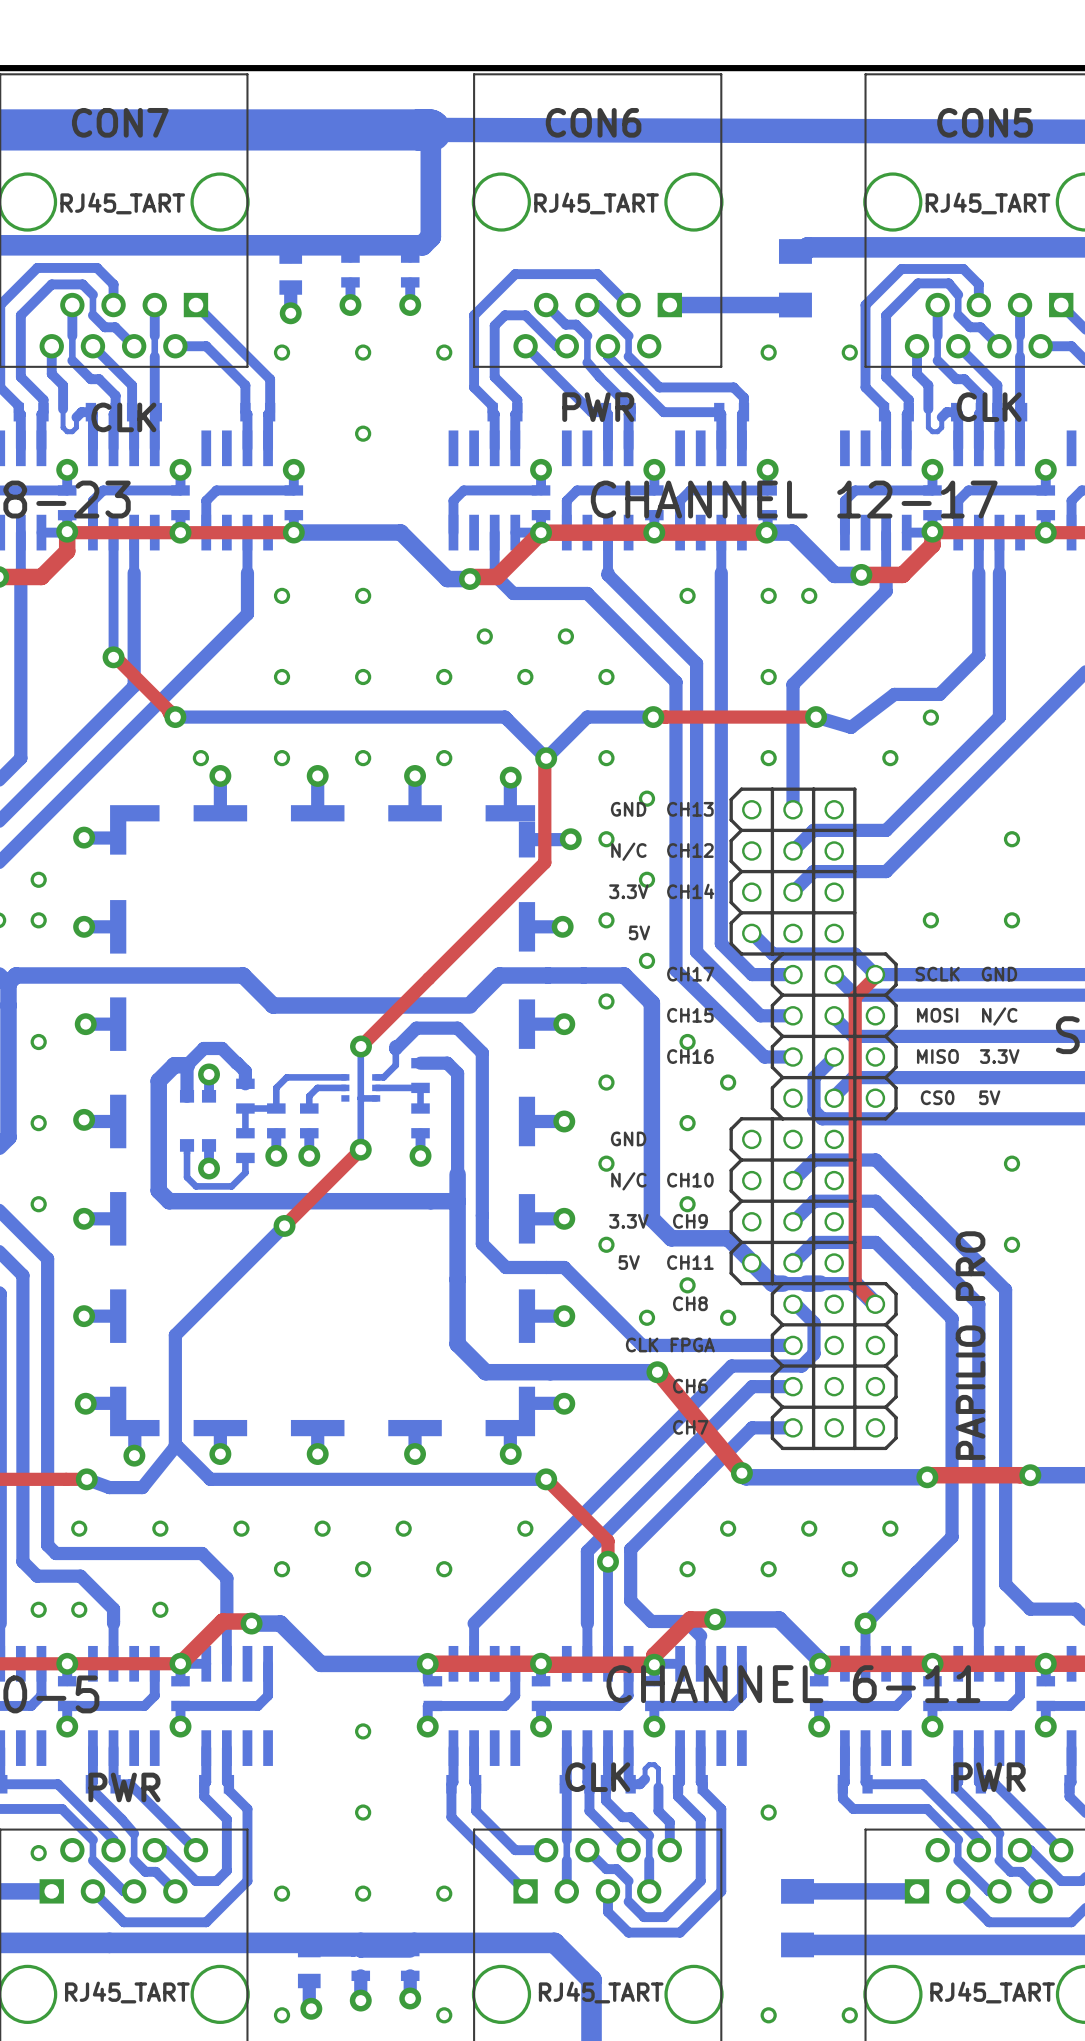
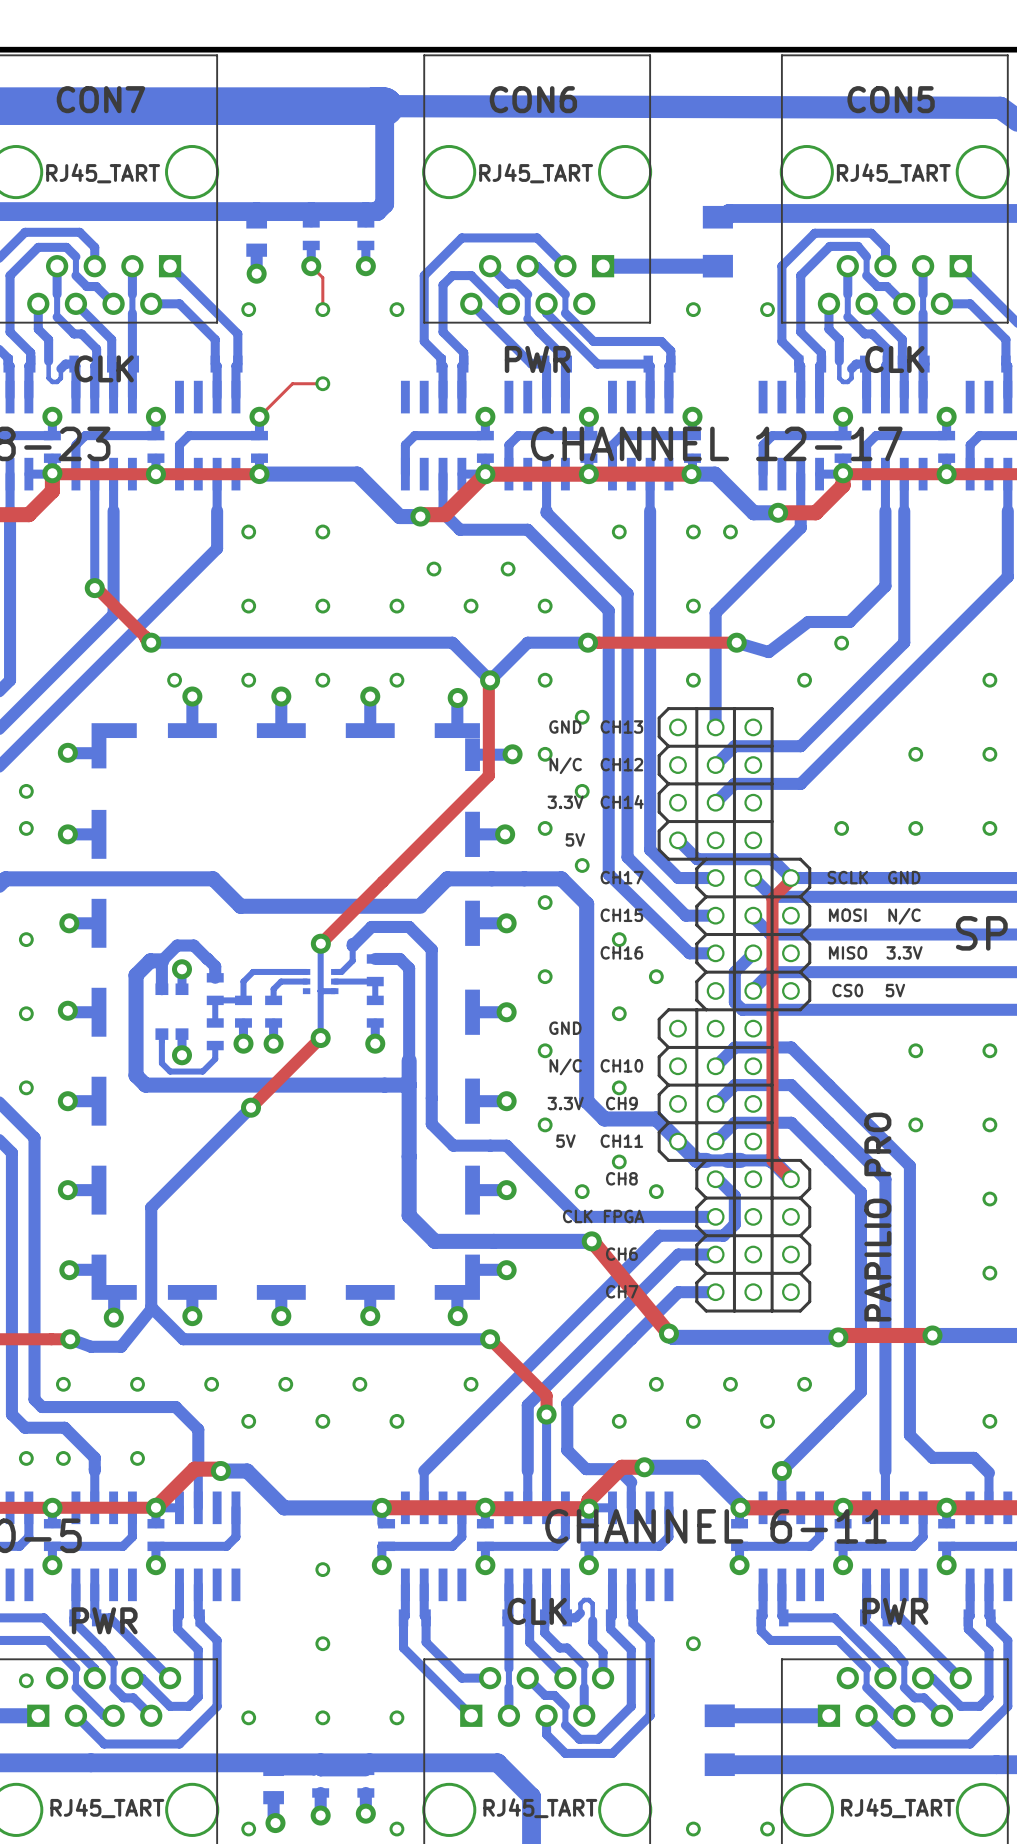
top track: none -> (311, 266) (322, 277) (322, 309)
top track: none -> (322, 383) (292, 383) (259, 416)

